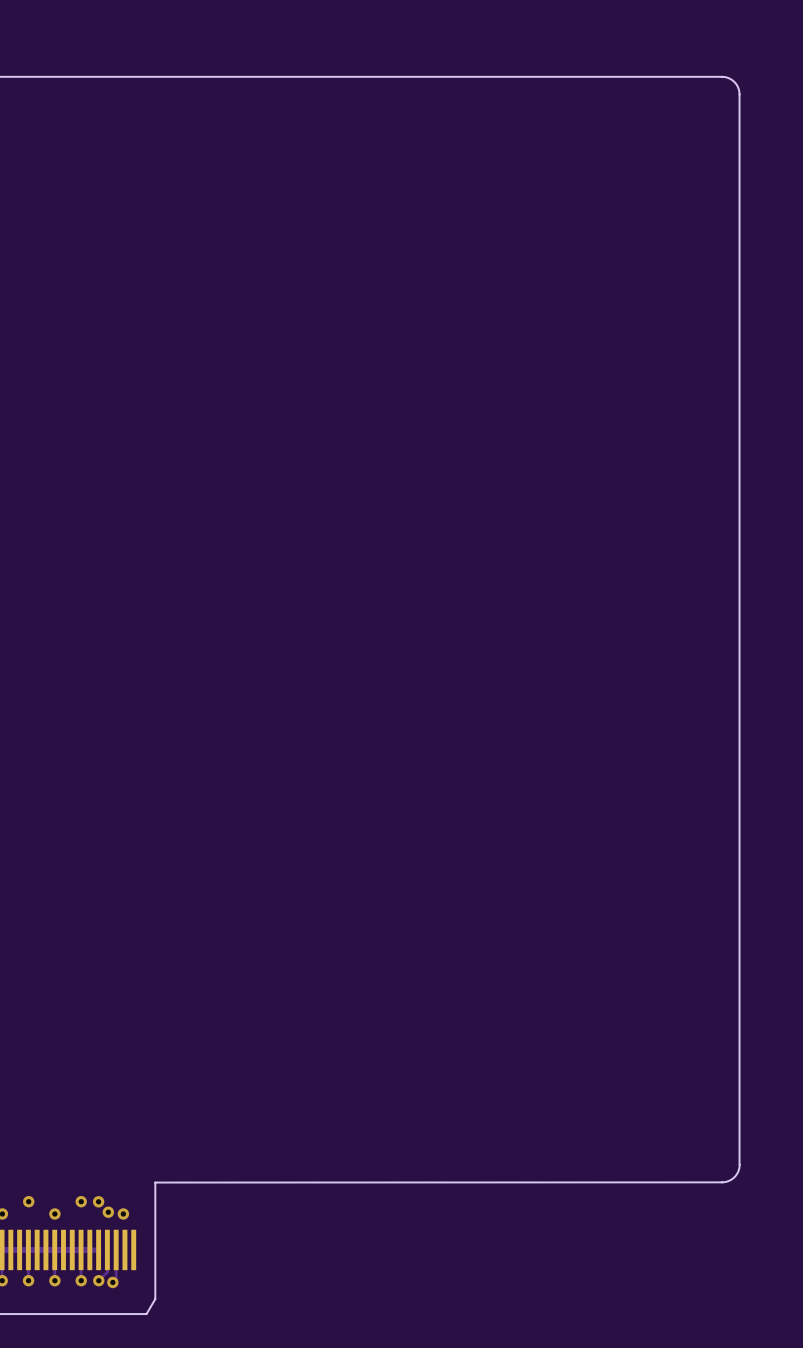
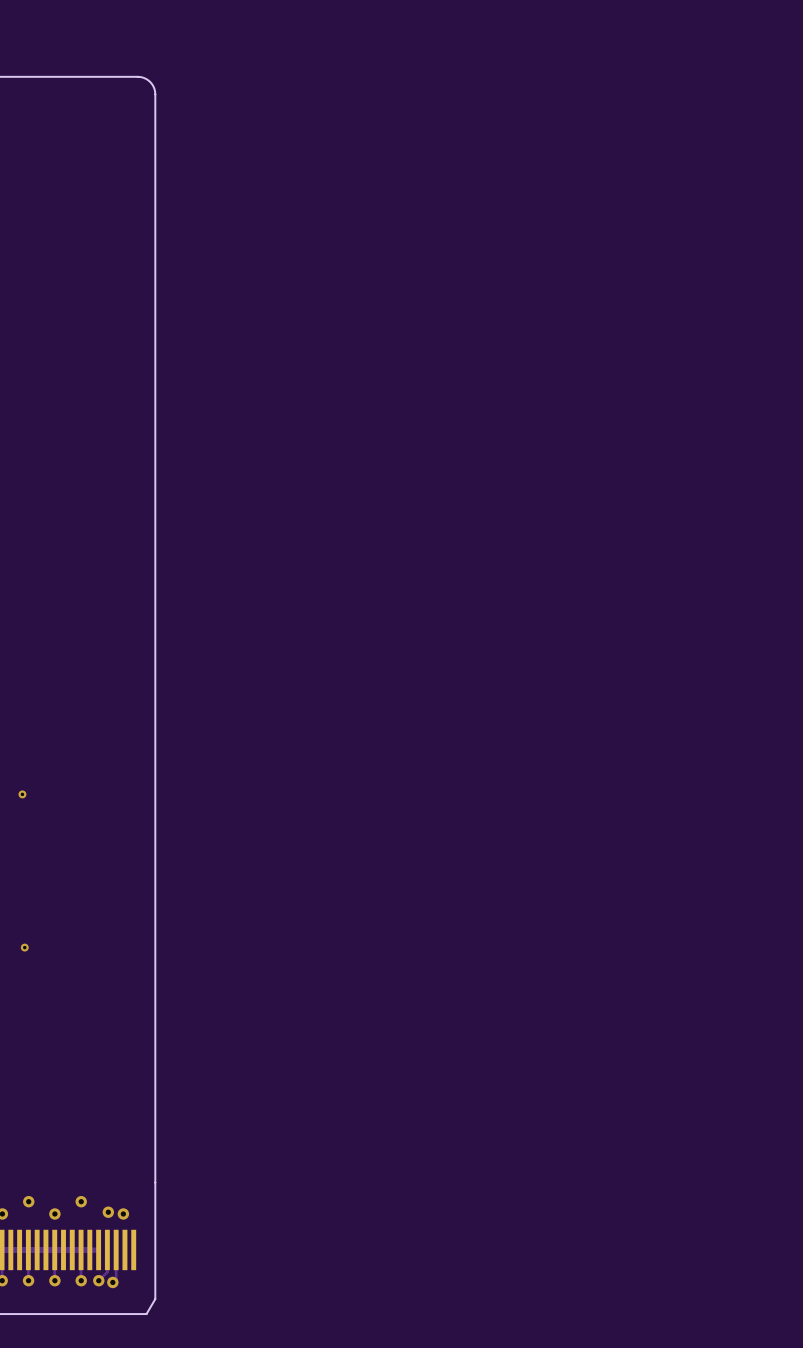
board edge: (137, 76) (721, 76) (729, 78) (736, 85) (739, 94) (739, 1164) -> (137, 76) (150, 81) (155, 94) (155, 1182)
via: none -> (22, 794)
via: none -> (24, 947)
board edge: (739, 1164) (734, 1177) (721, 1182) (155, 1182) -> none
via: (98, 1201) -> none

